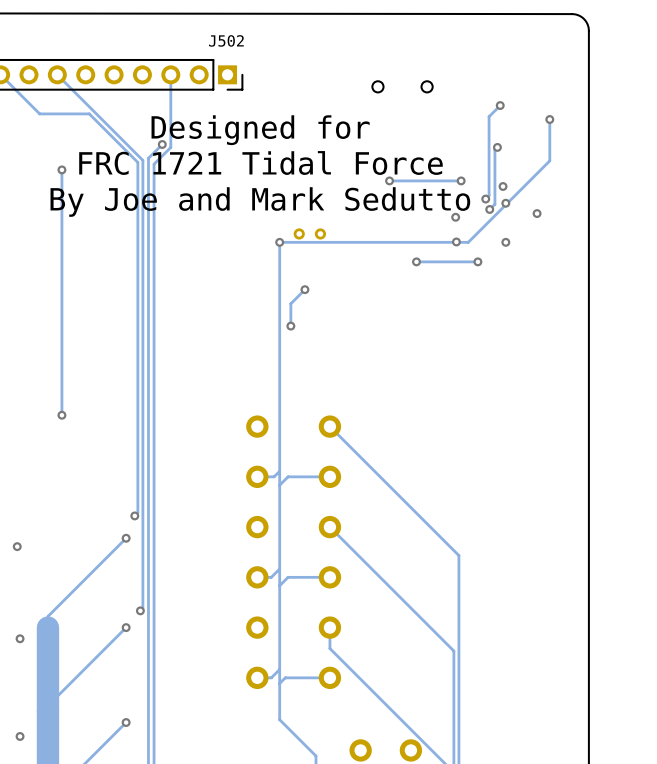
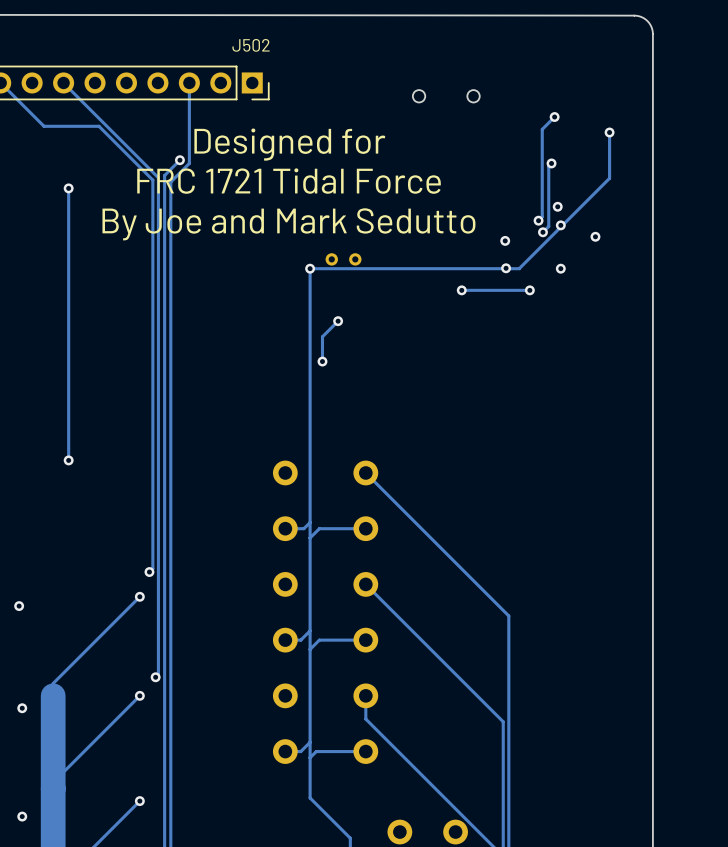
via: (389, 180) -> none
track: (461, 180) (389, 180) -> none
via: (461, 180) -> none

